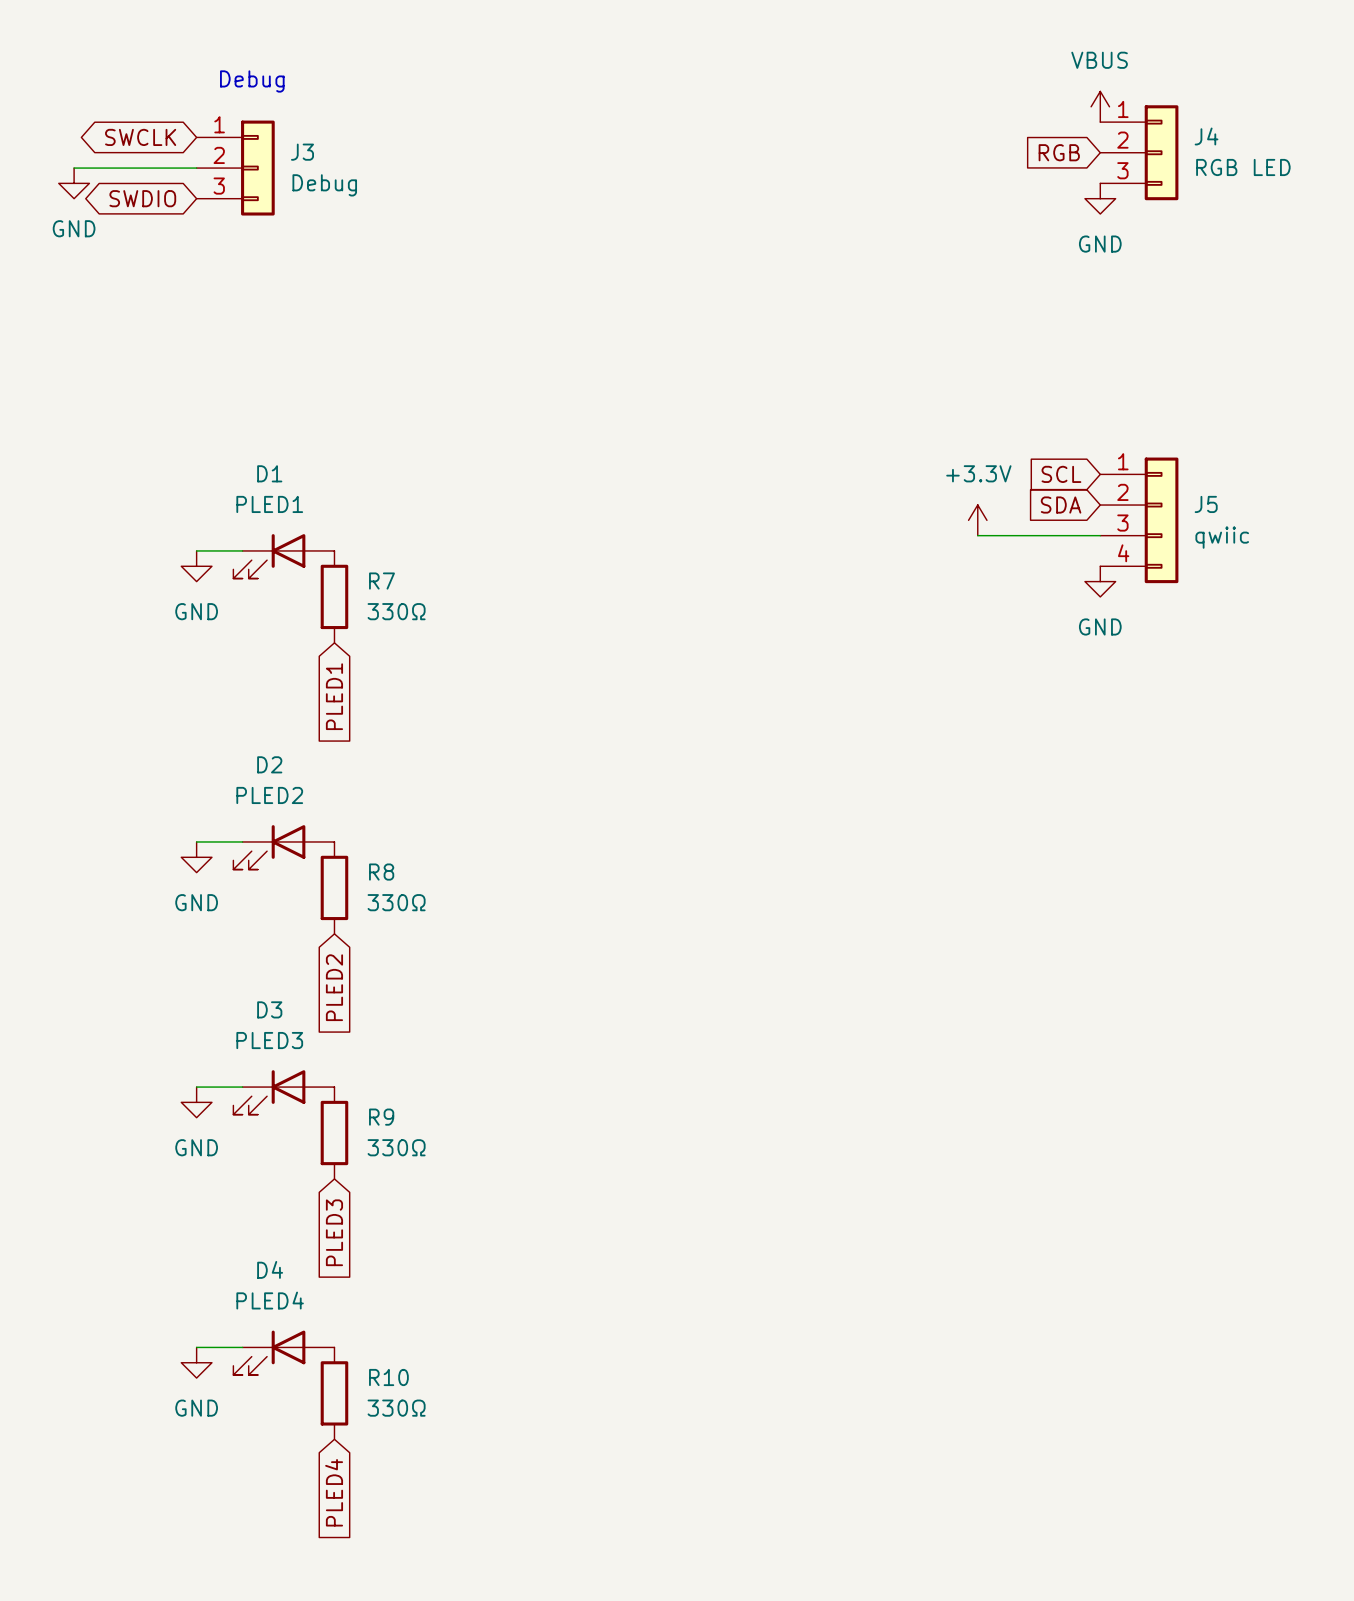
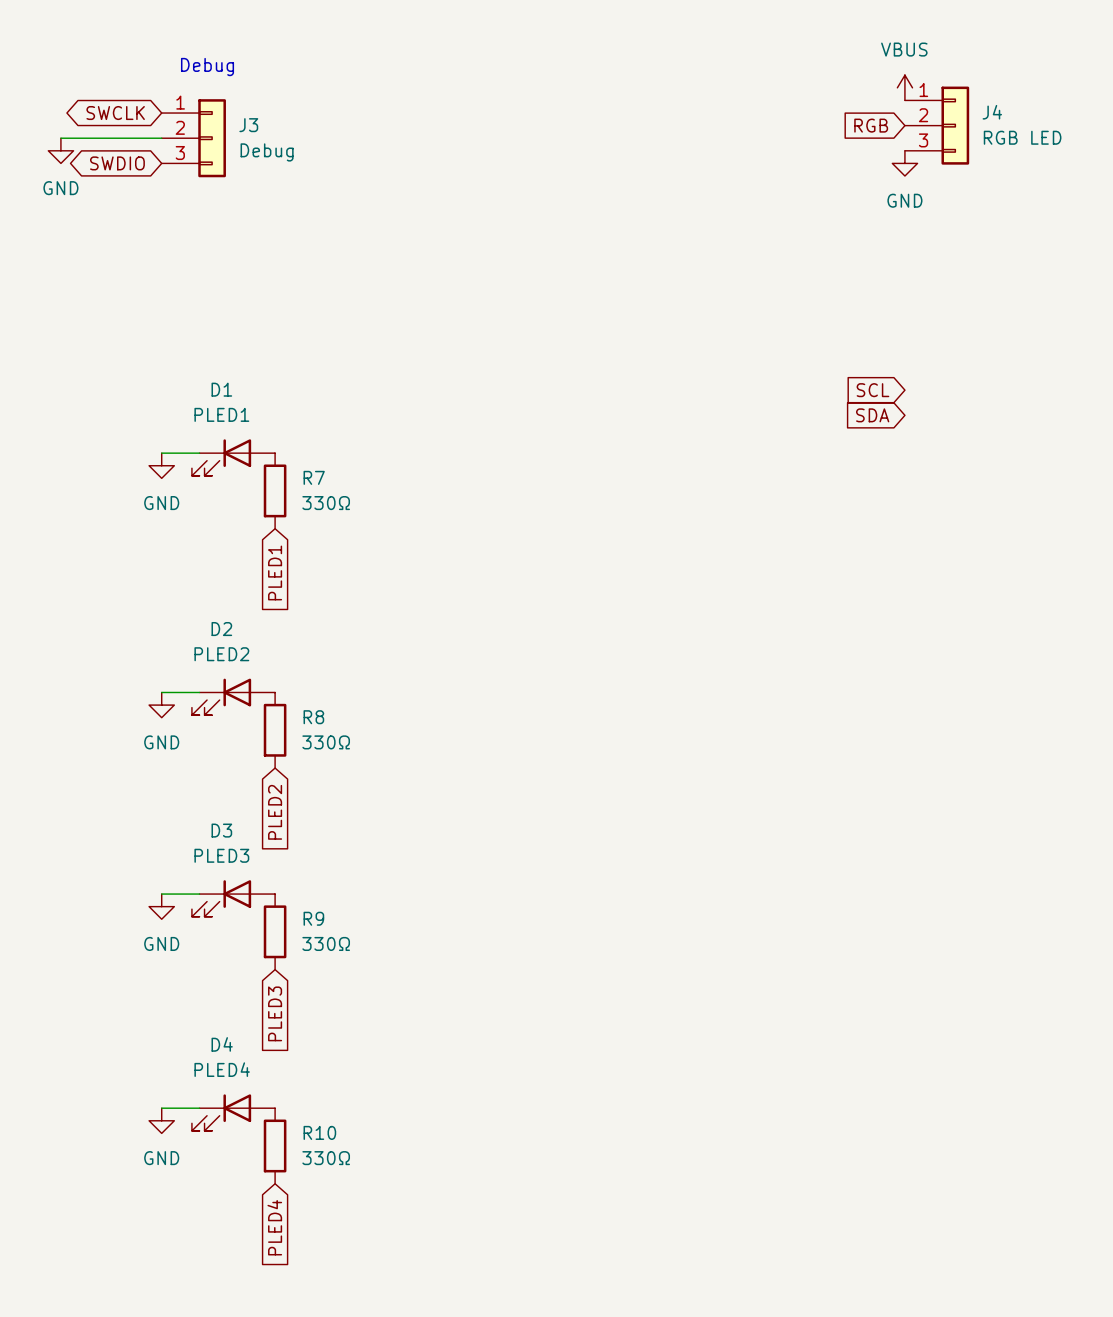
power symbol: +3.3V (977, 520) -> none
J5: qwiic (1139, 520) -> none
wire: (977, 535) (1100, 535) -> none
power symbol: GND (1100, 581) -> none

